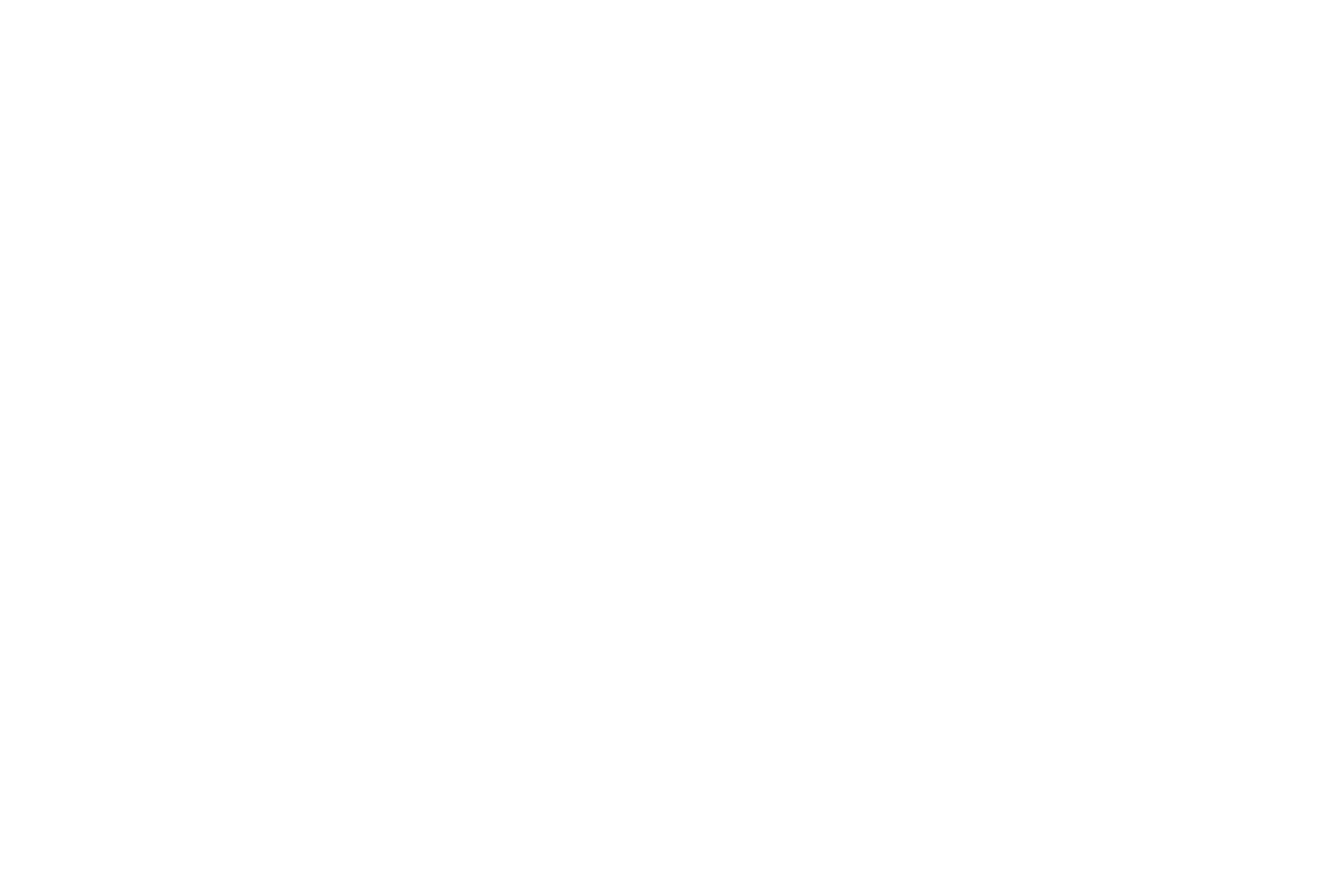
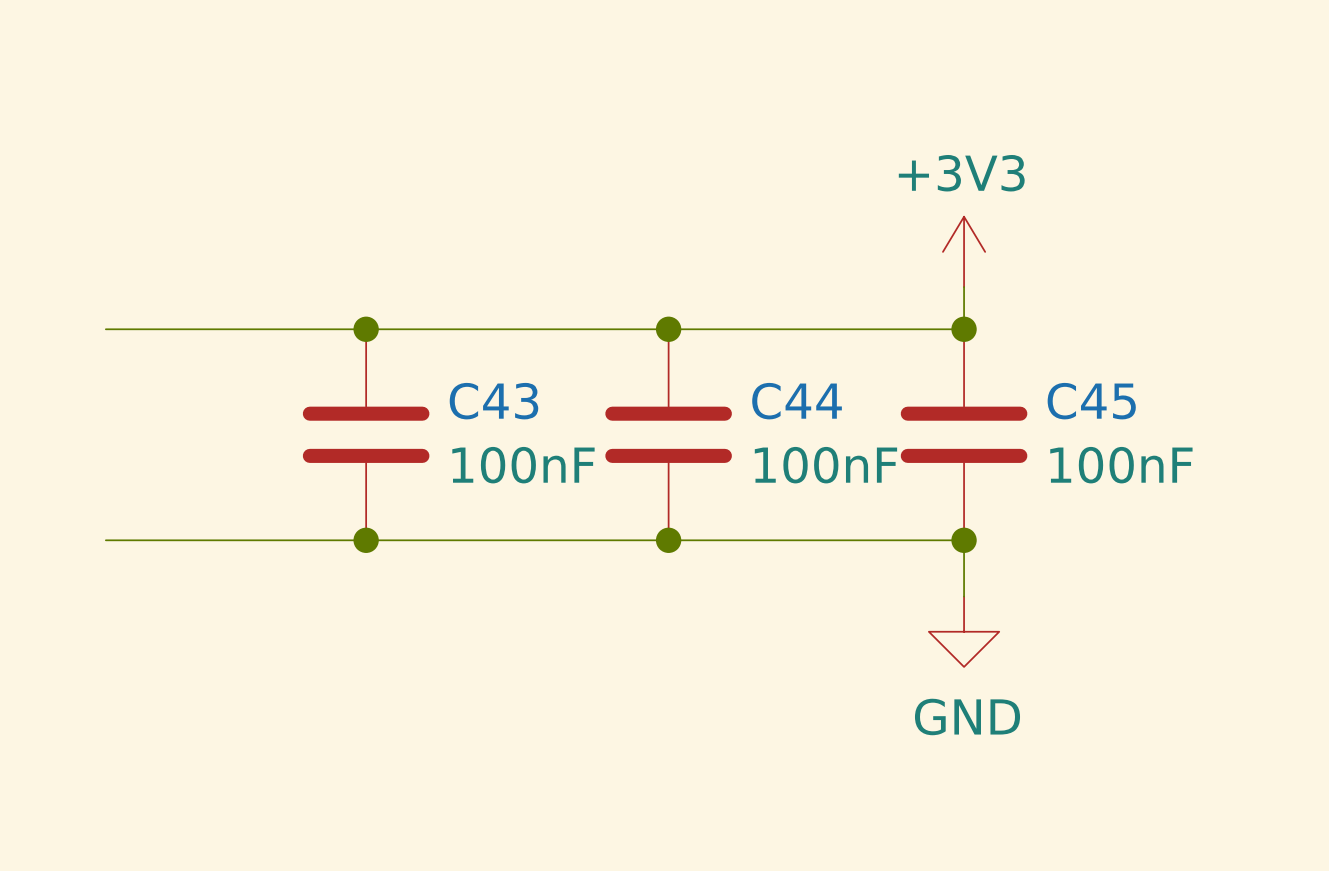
power symbol: none -> +3V3 (964, 251)
wire: none -> (964, 287) (964, 329) (105, 329)
junction: none -> (366, 329)
junction: none -> (668, 329)
junction: none -> (964, 329)
C43: none -> 100nF (366, 434)
C44: none -> 100nF (668, 434)
C45: none -> 100nF (964, 434)
wire: none -> (105, 540) (964, 540) (964, 596)
junction: none -> (366, 540)
junction: none -> (668, 540)
junction: none -> (964, 540)
power symbol: none -> GND (964, 631)

